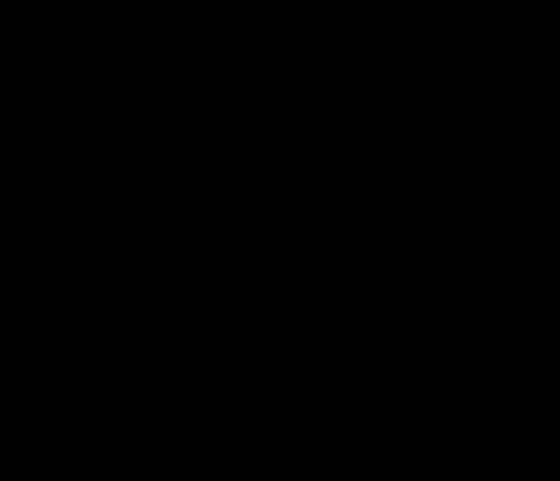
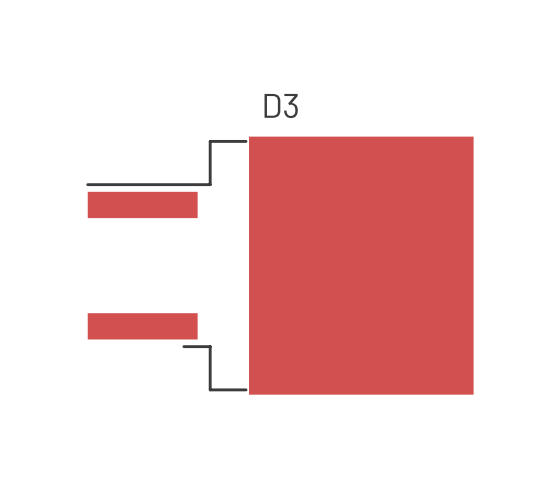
D3: none -> (279, 265)

